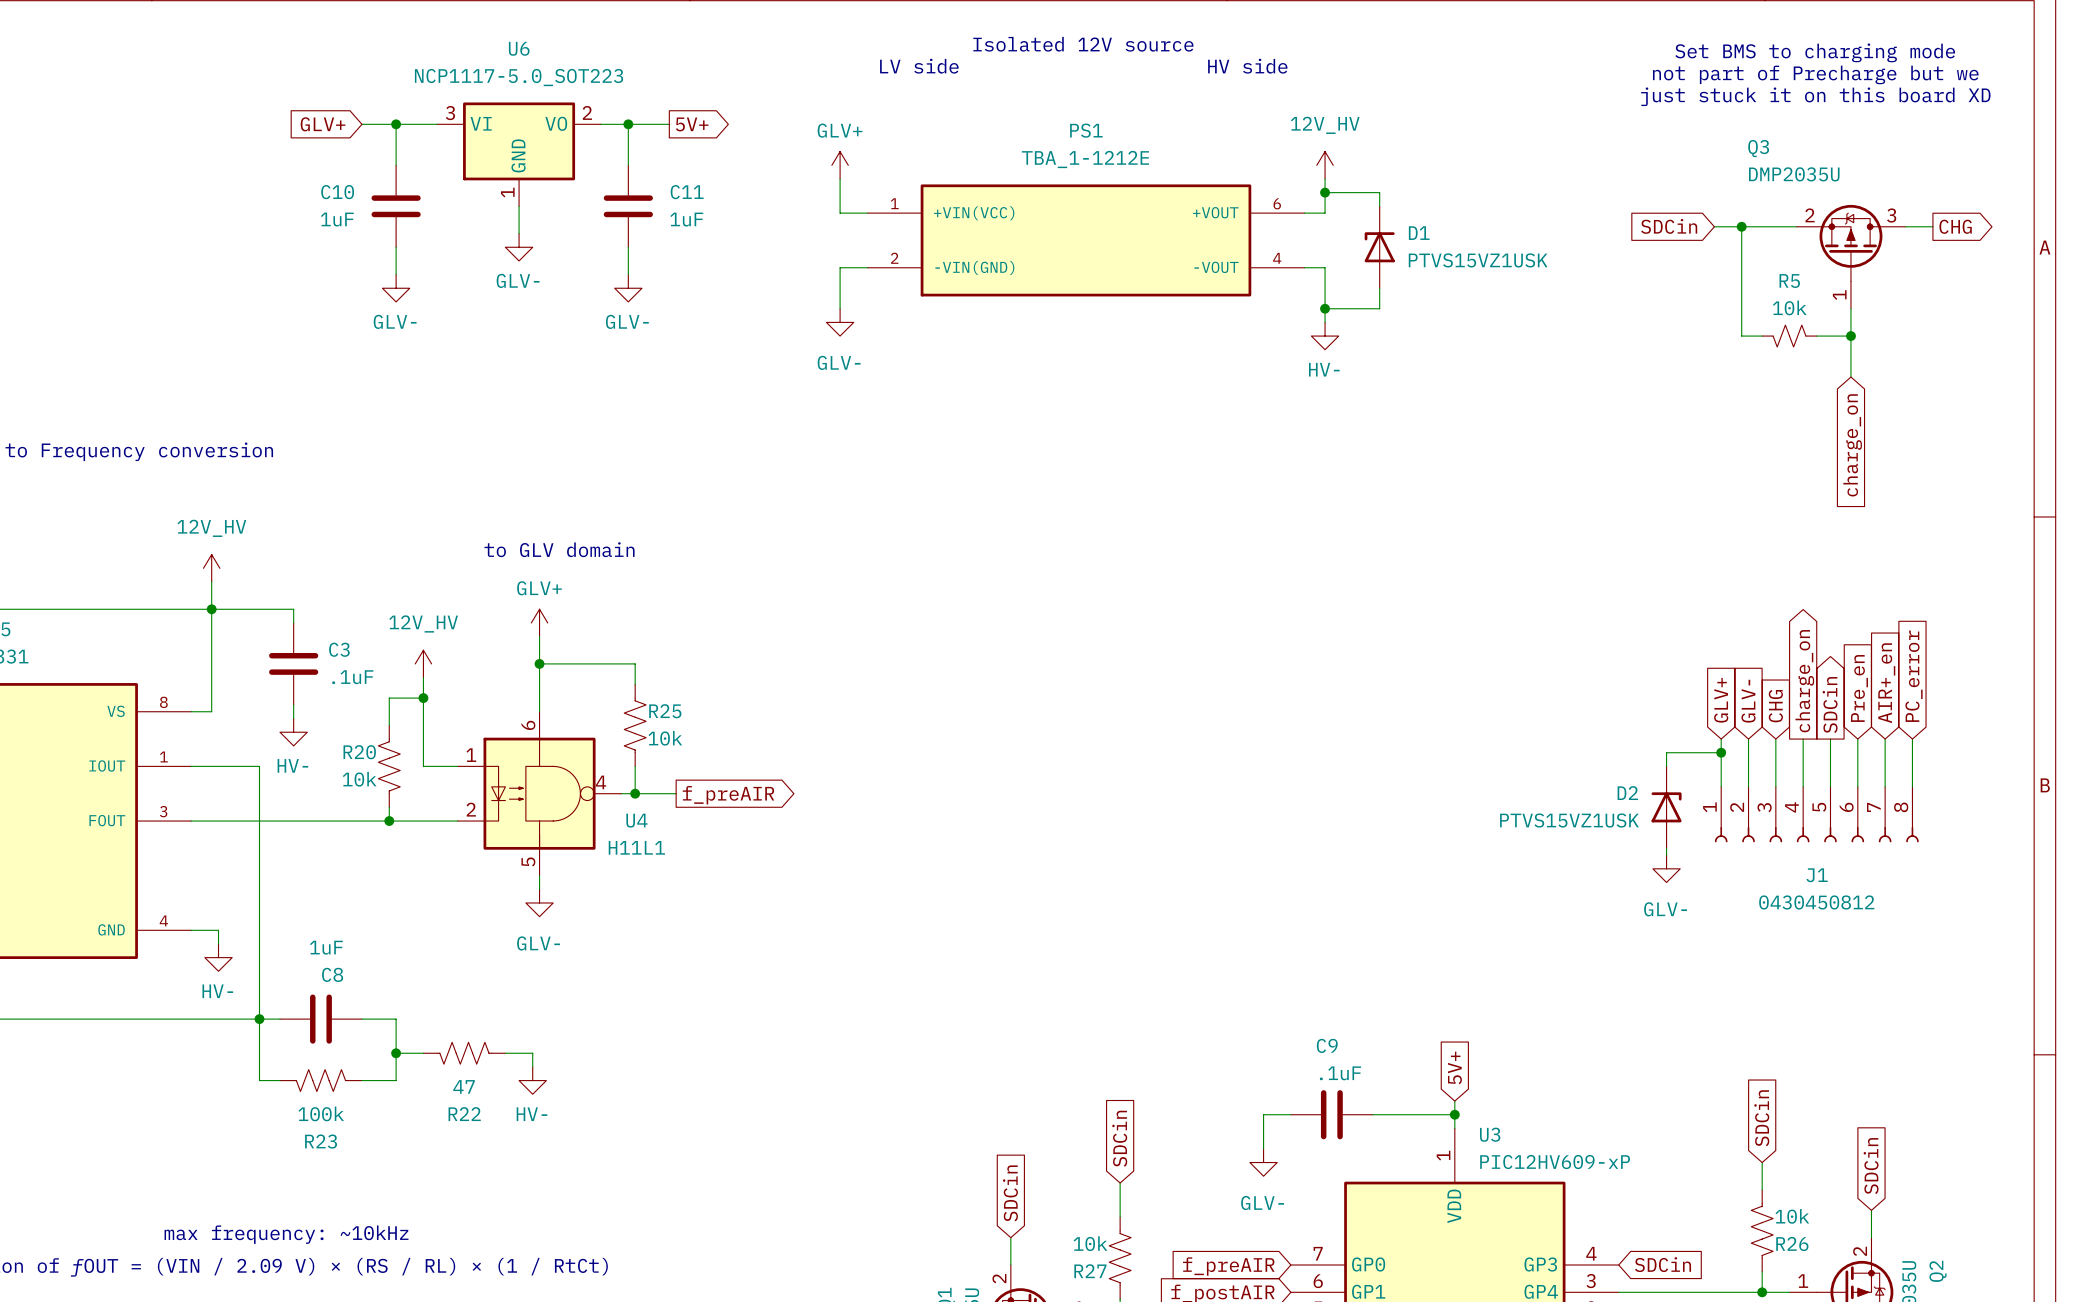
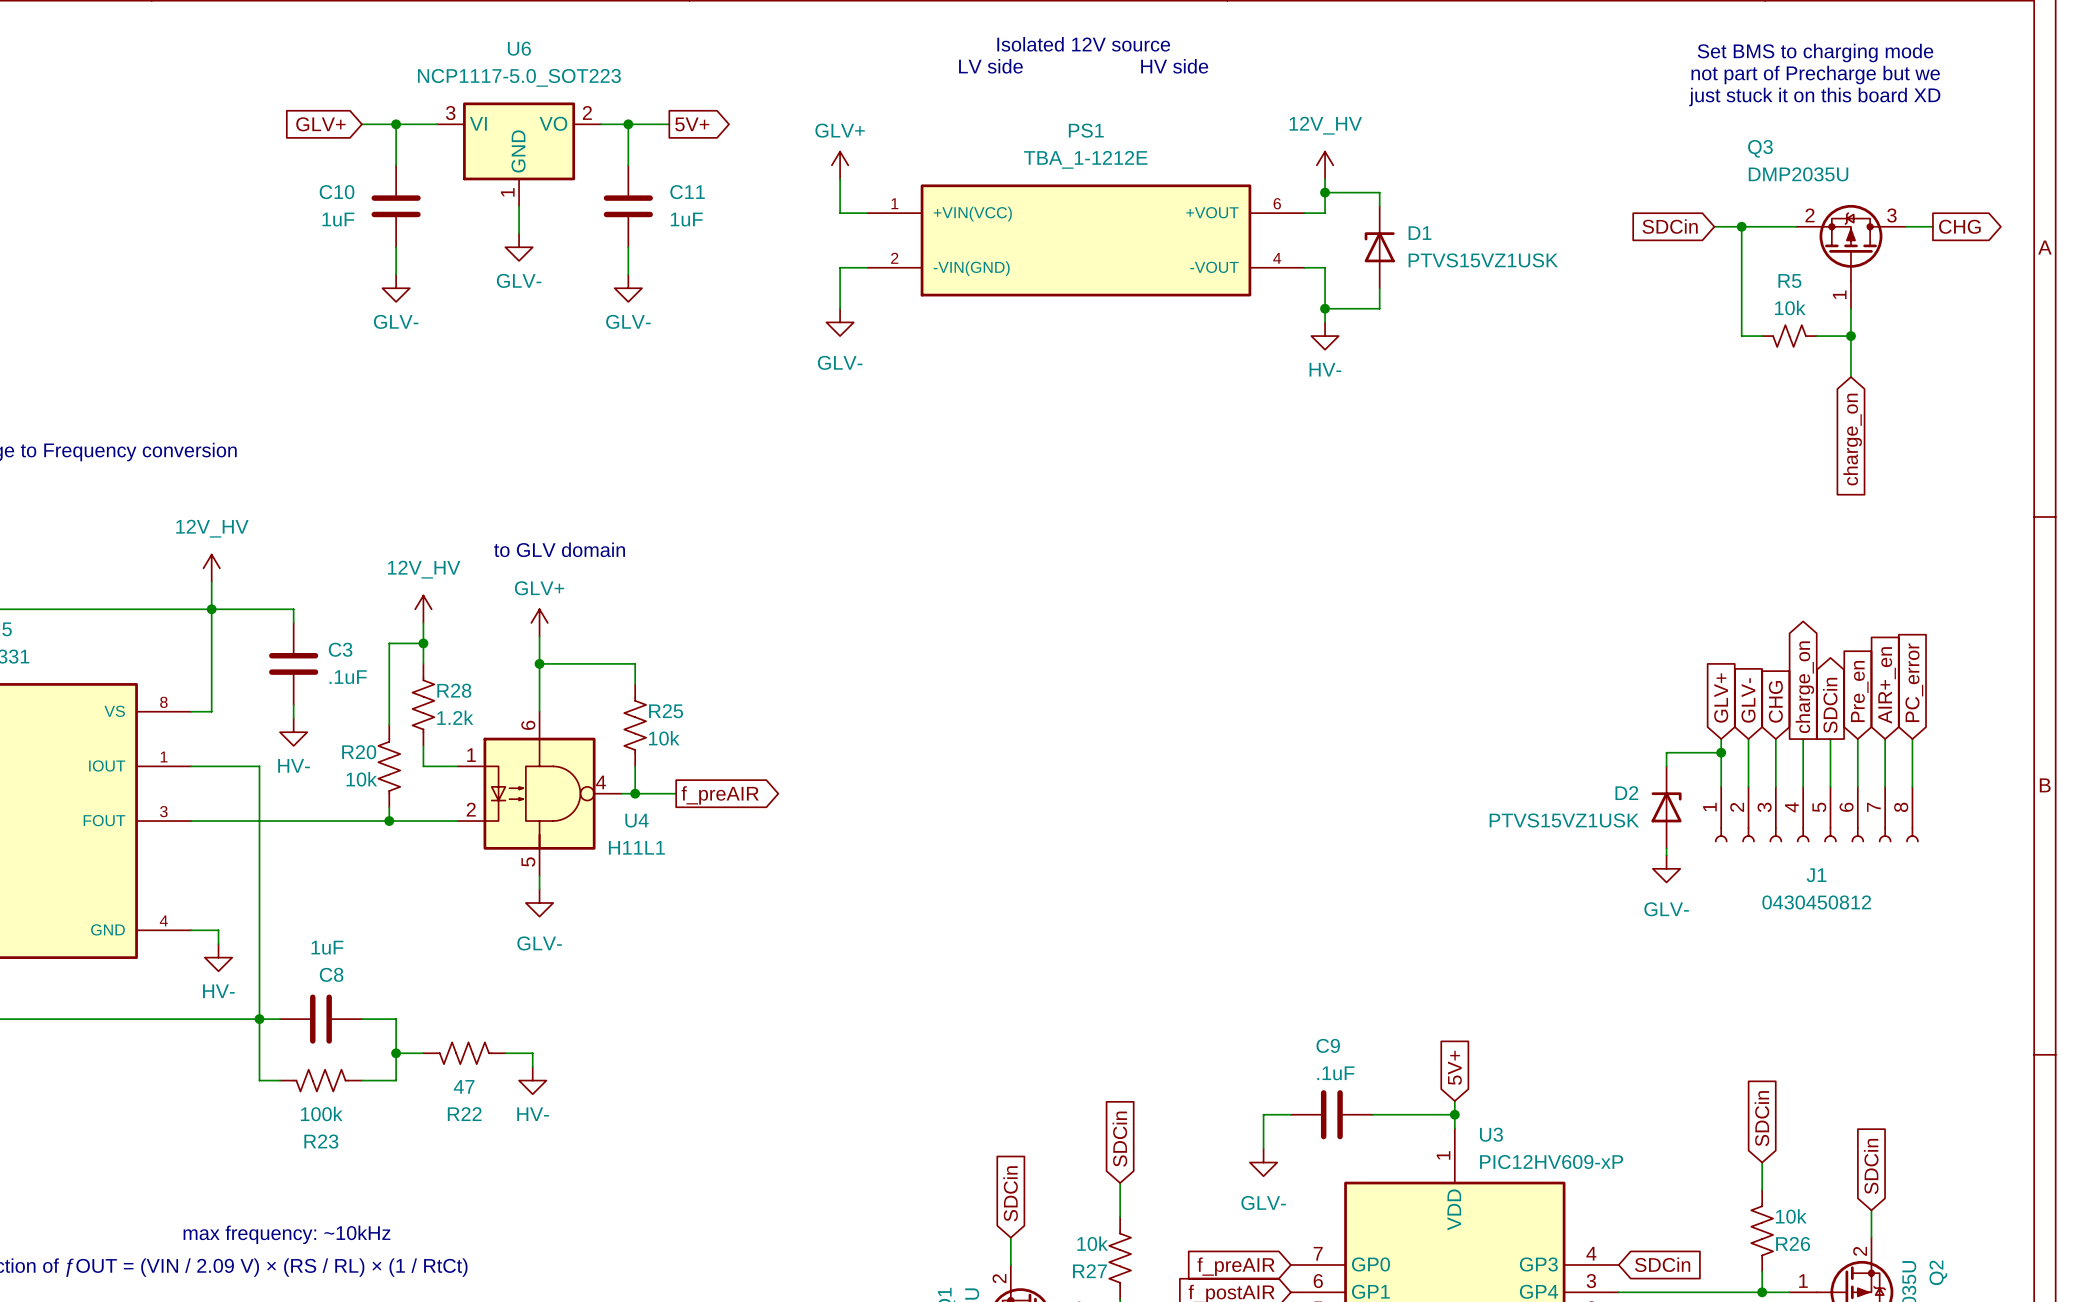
wire: none -> (423, 622) (423, 663)
power symbol position: 12V_HV (423, 663) -> 12V_HV (423, 609)
wire: (423, 677) (423, 745) -> none
wire: (389, 698) (423, 698) -> (389, 698) (389, 643) (423, 643)
junction position: (423, 698) -> (423, 643)
R28: none -> 1.2k (423, 704)

